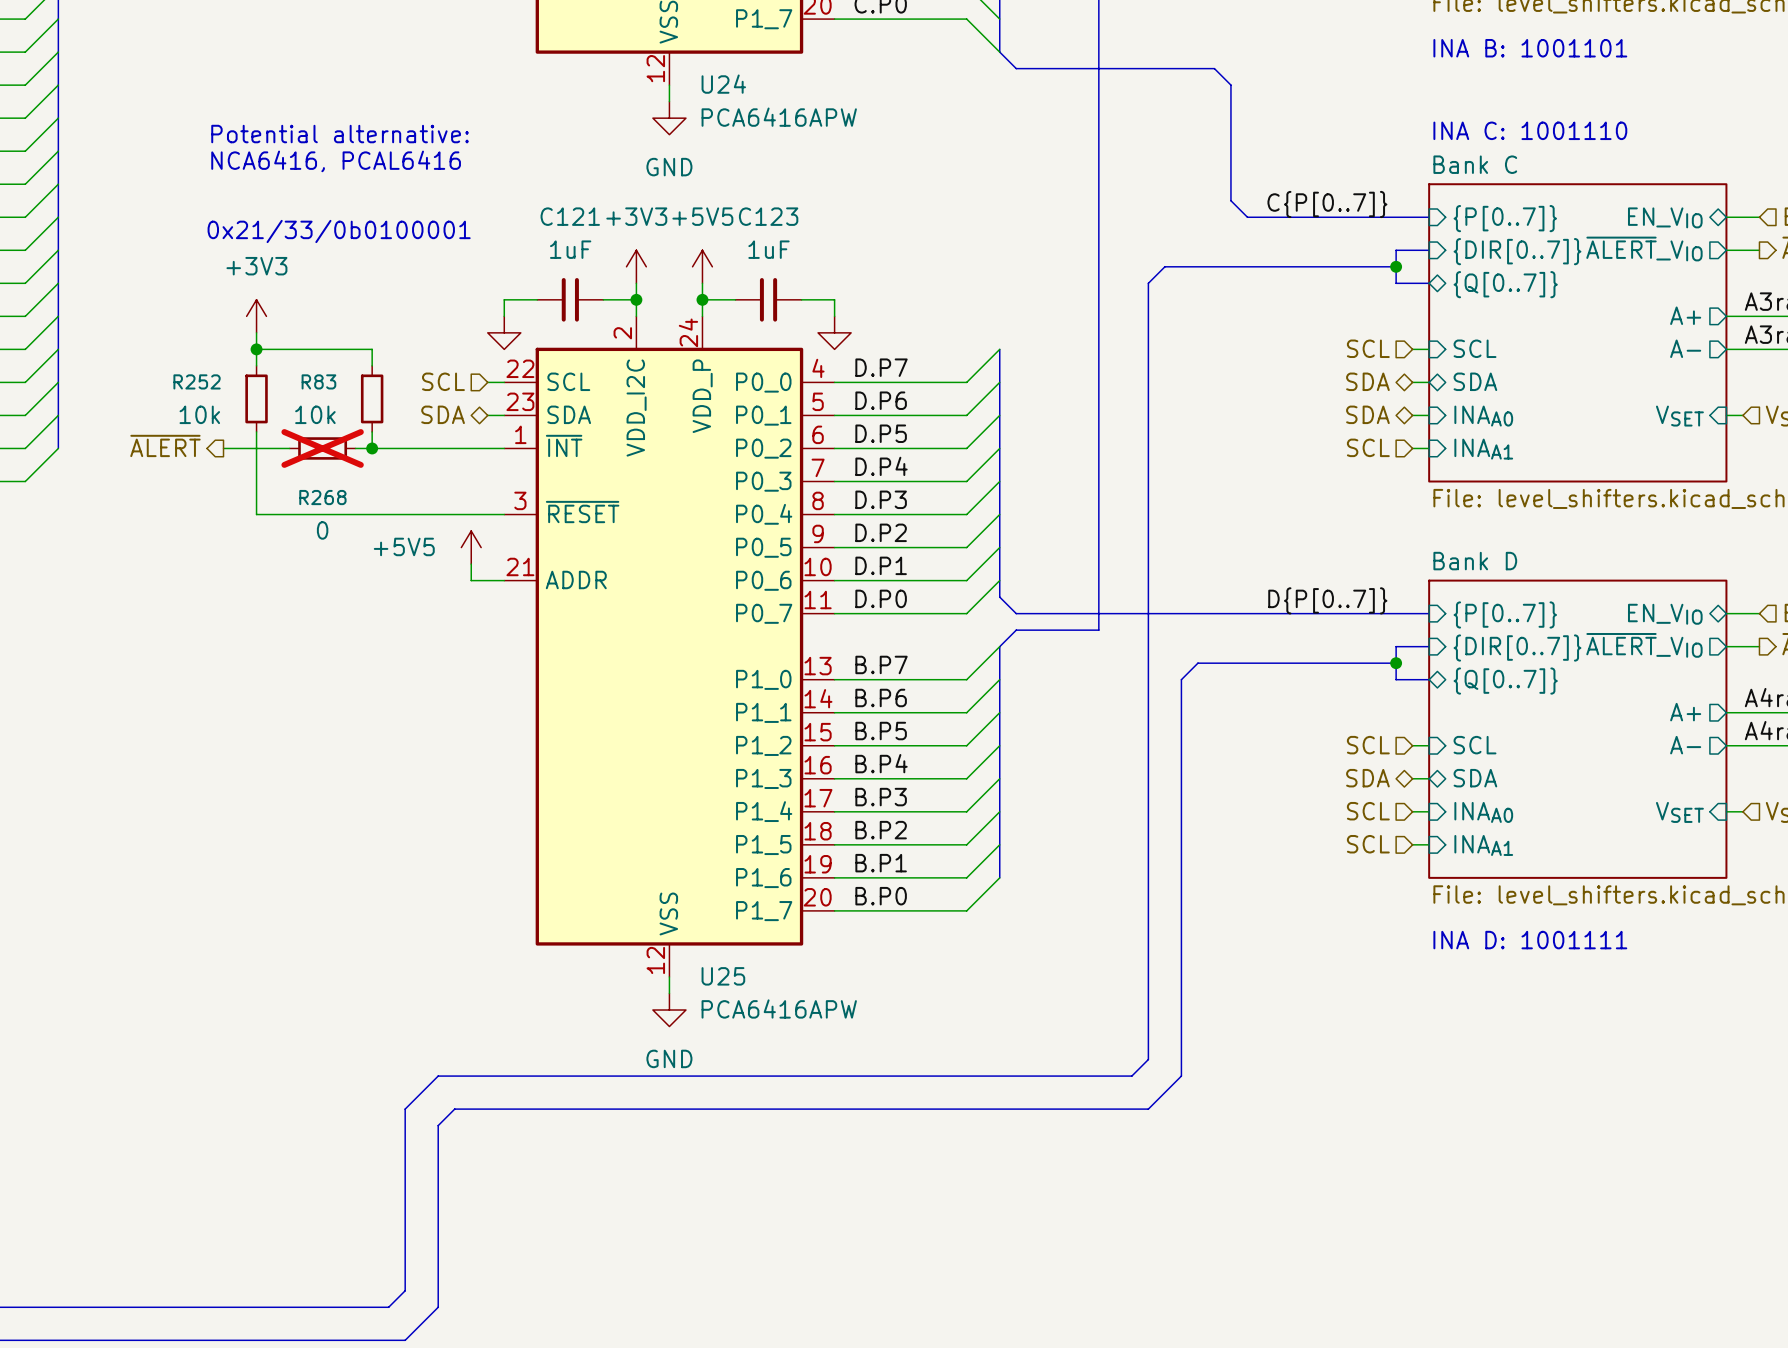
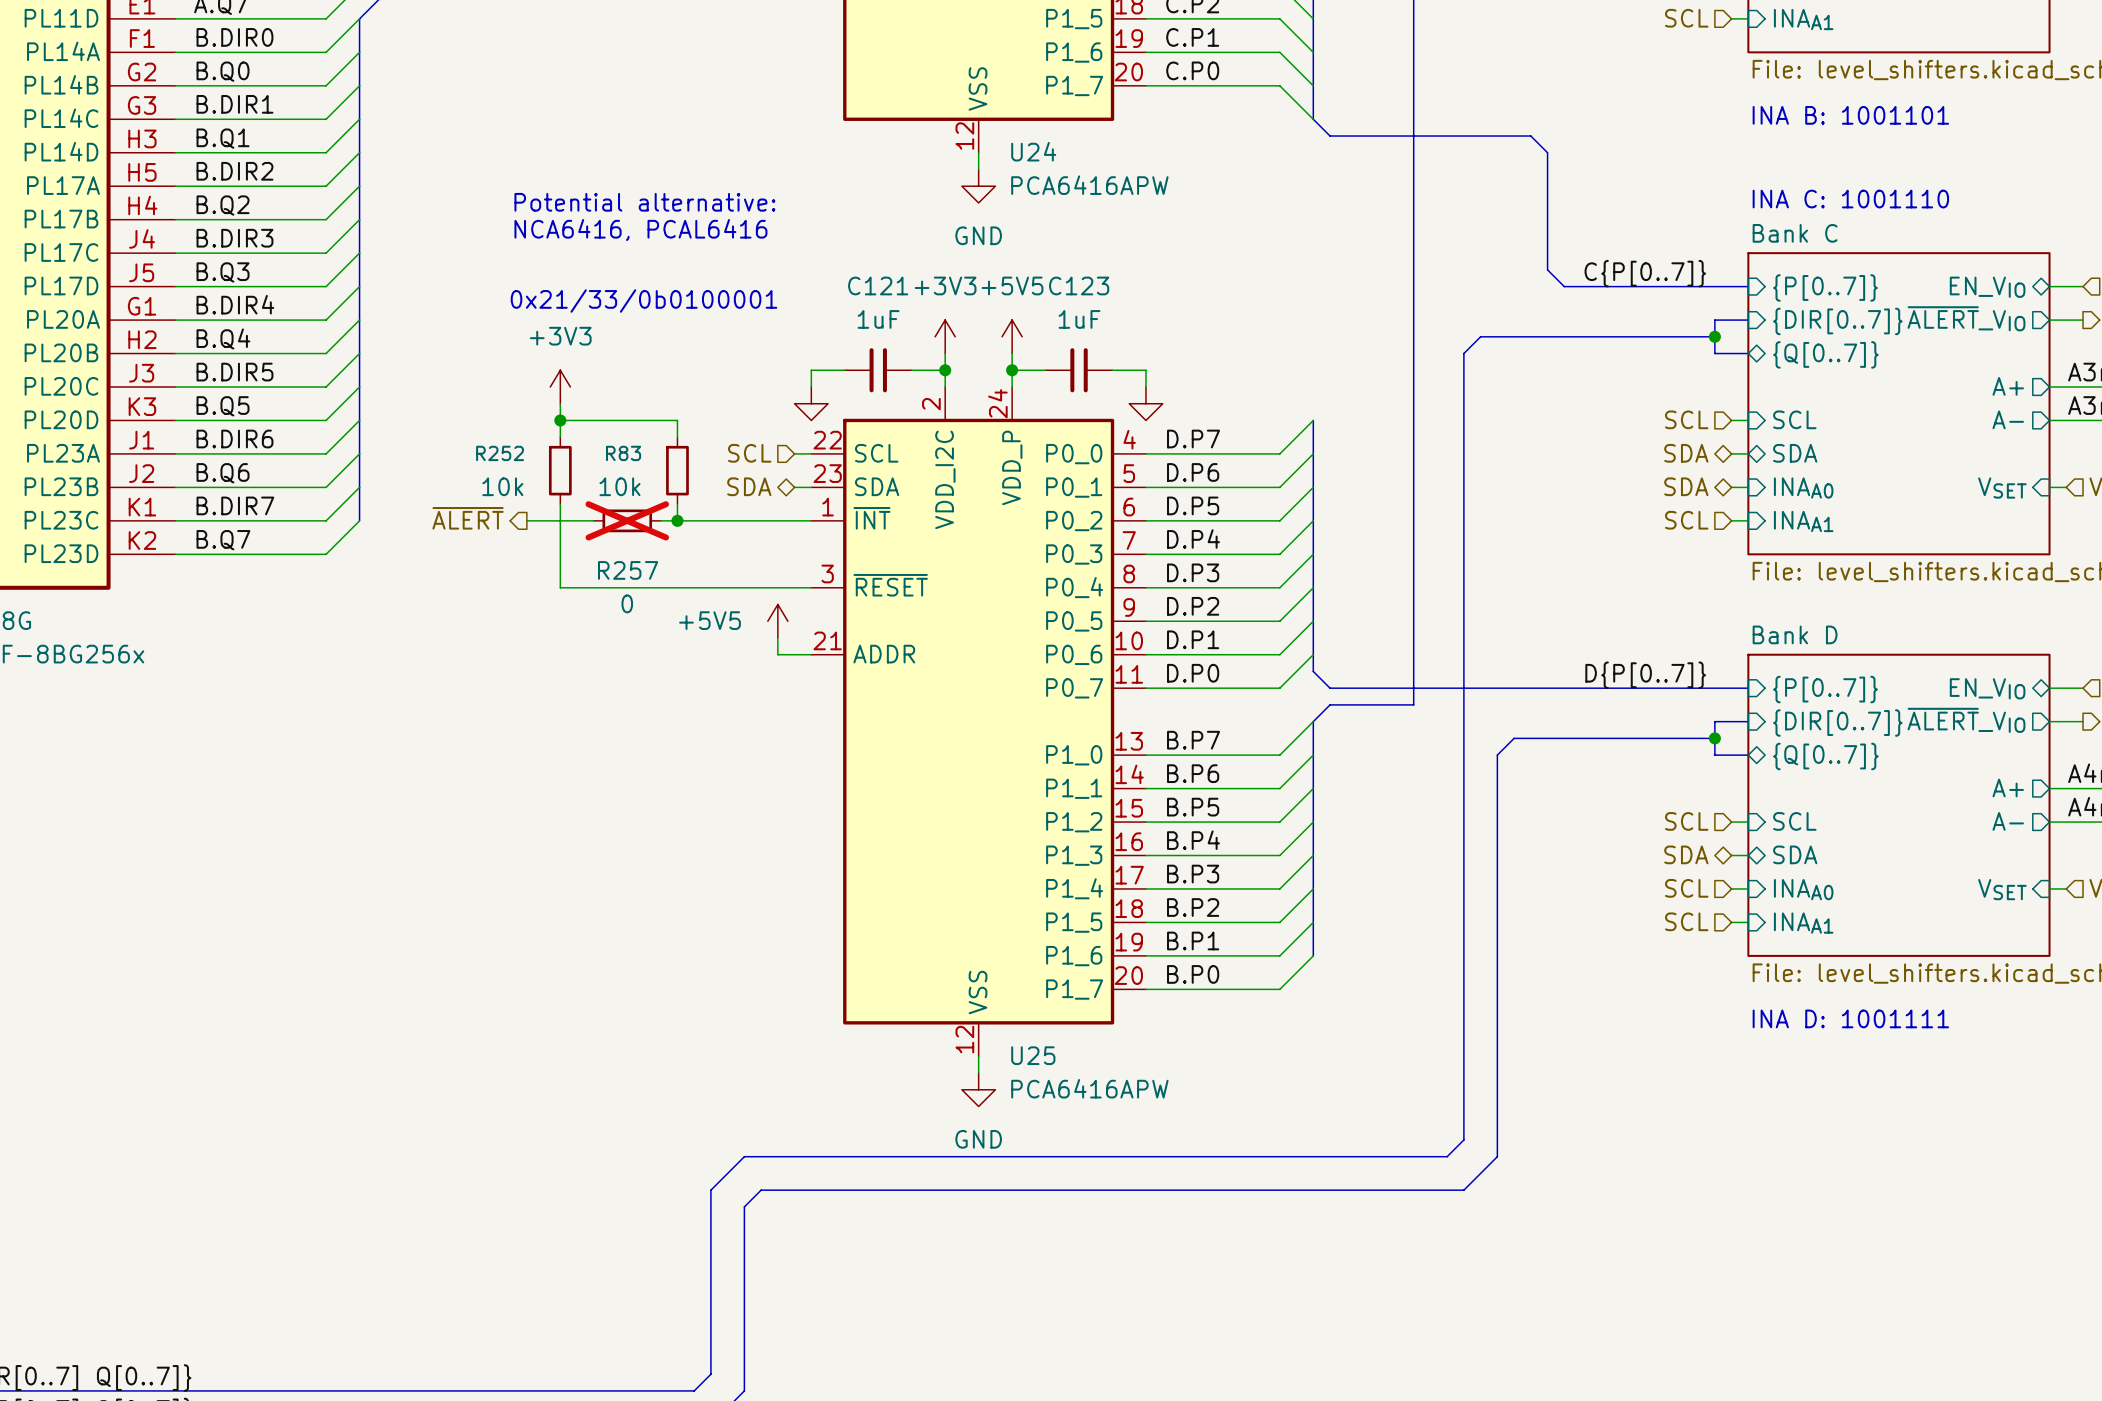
R268 name: R268 (322, 497) -> R257 (628, 570)

